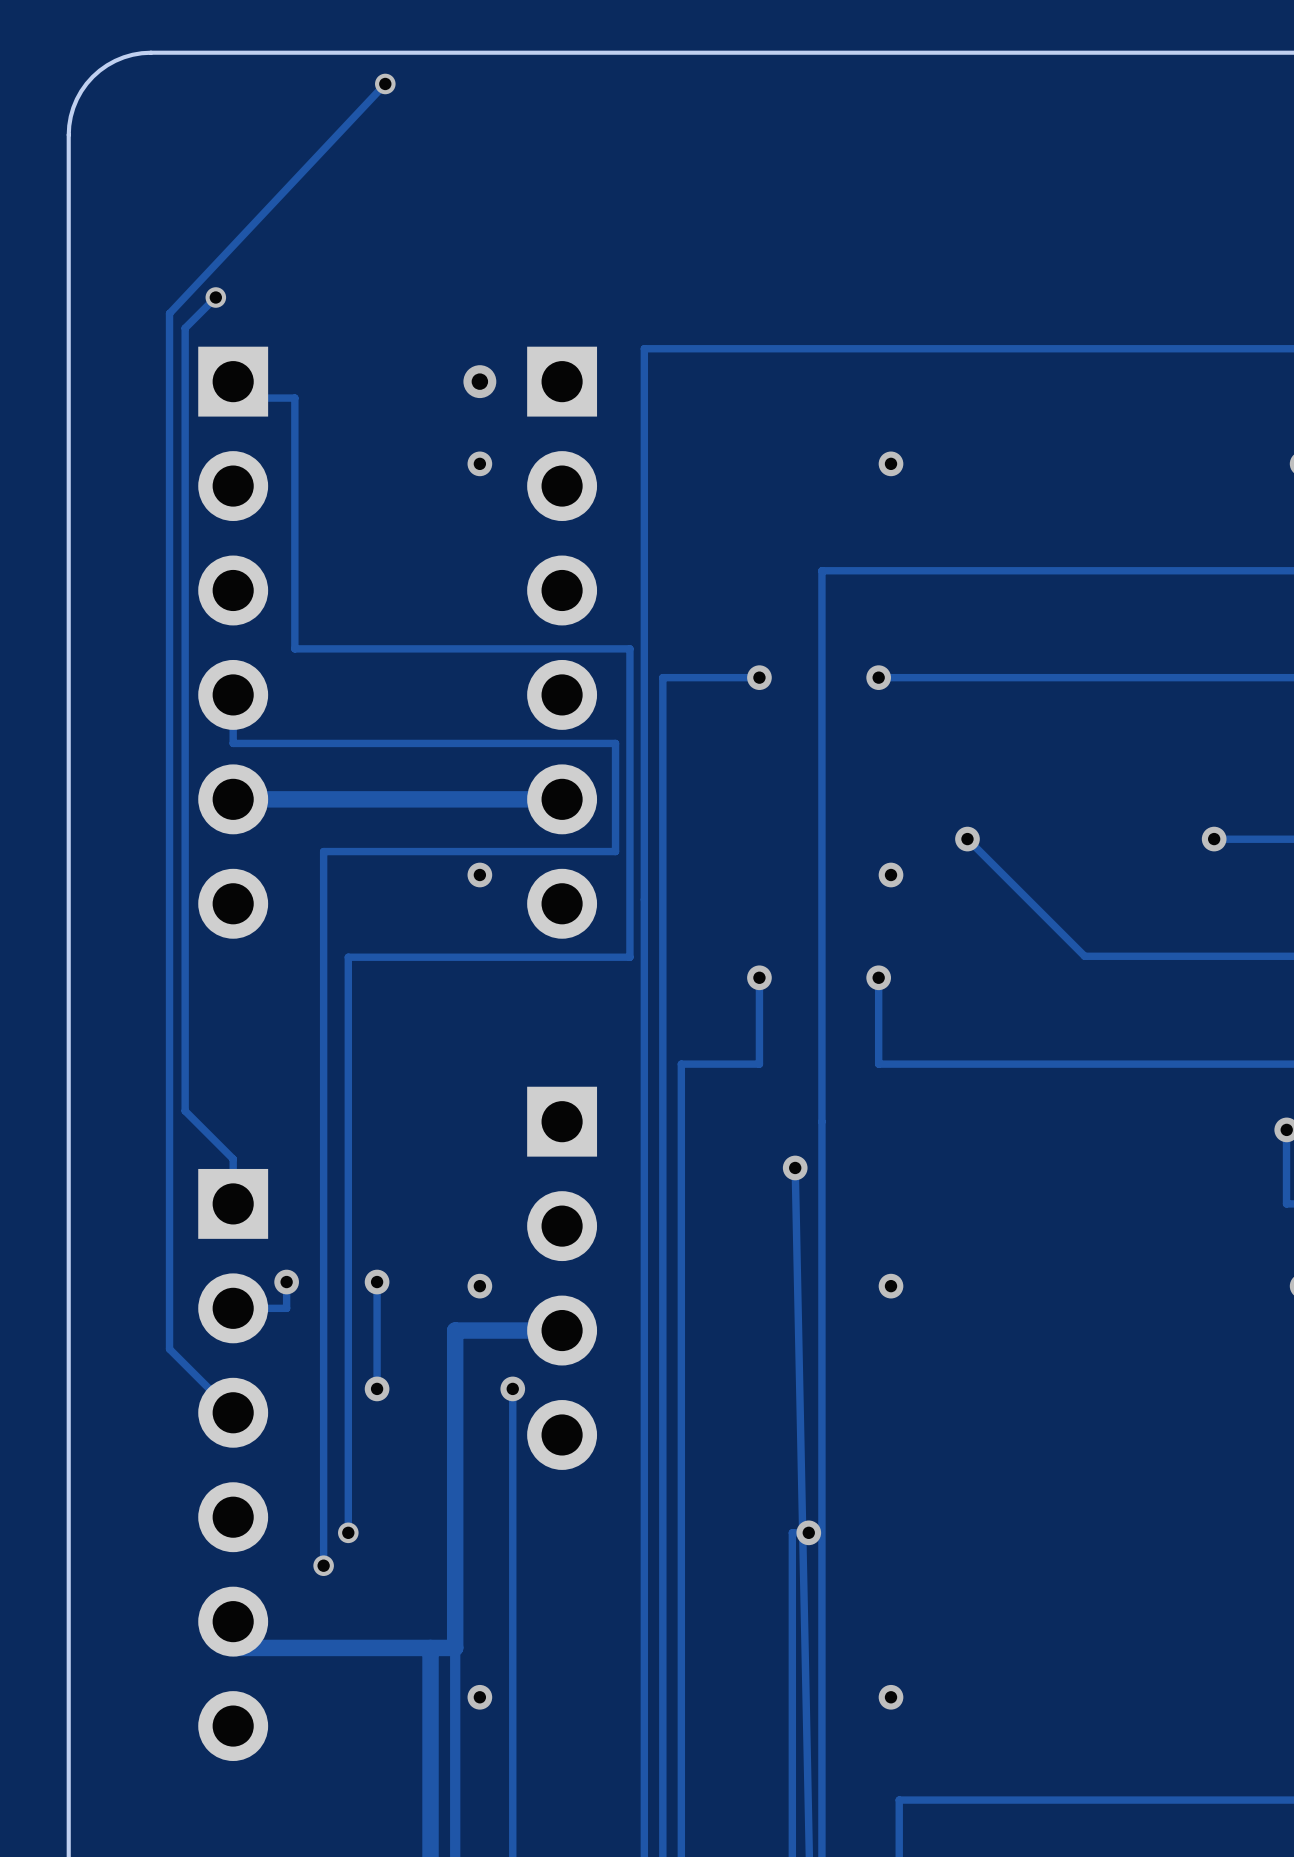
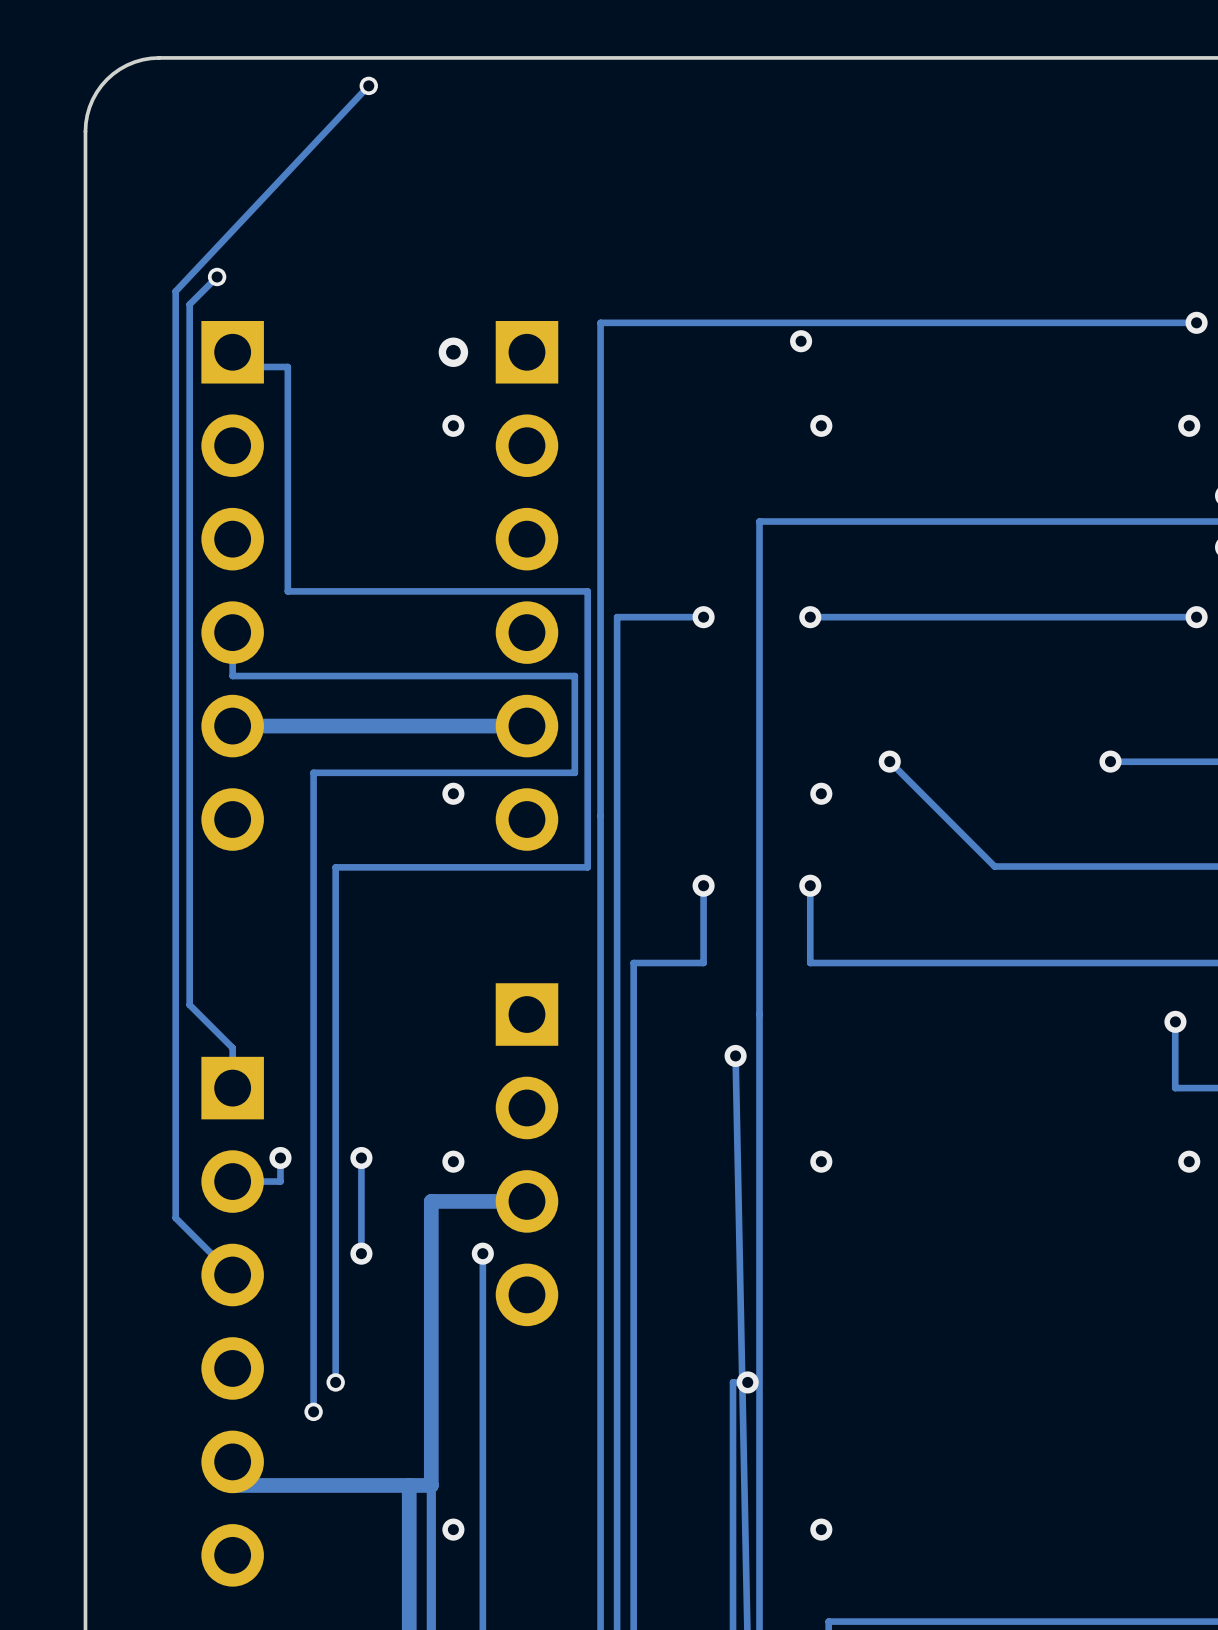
via: none -> (801, 341)

